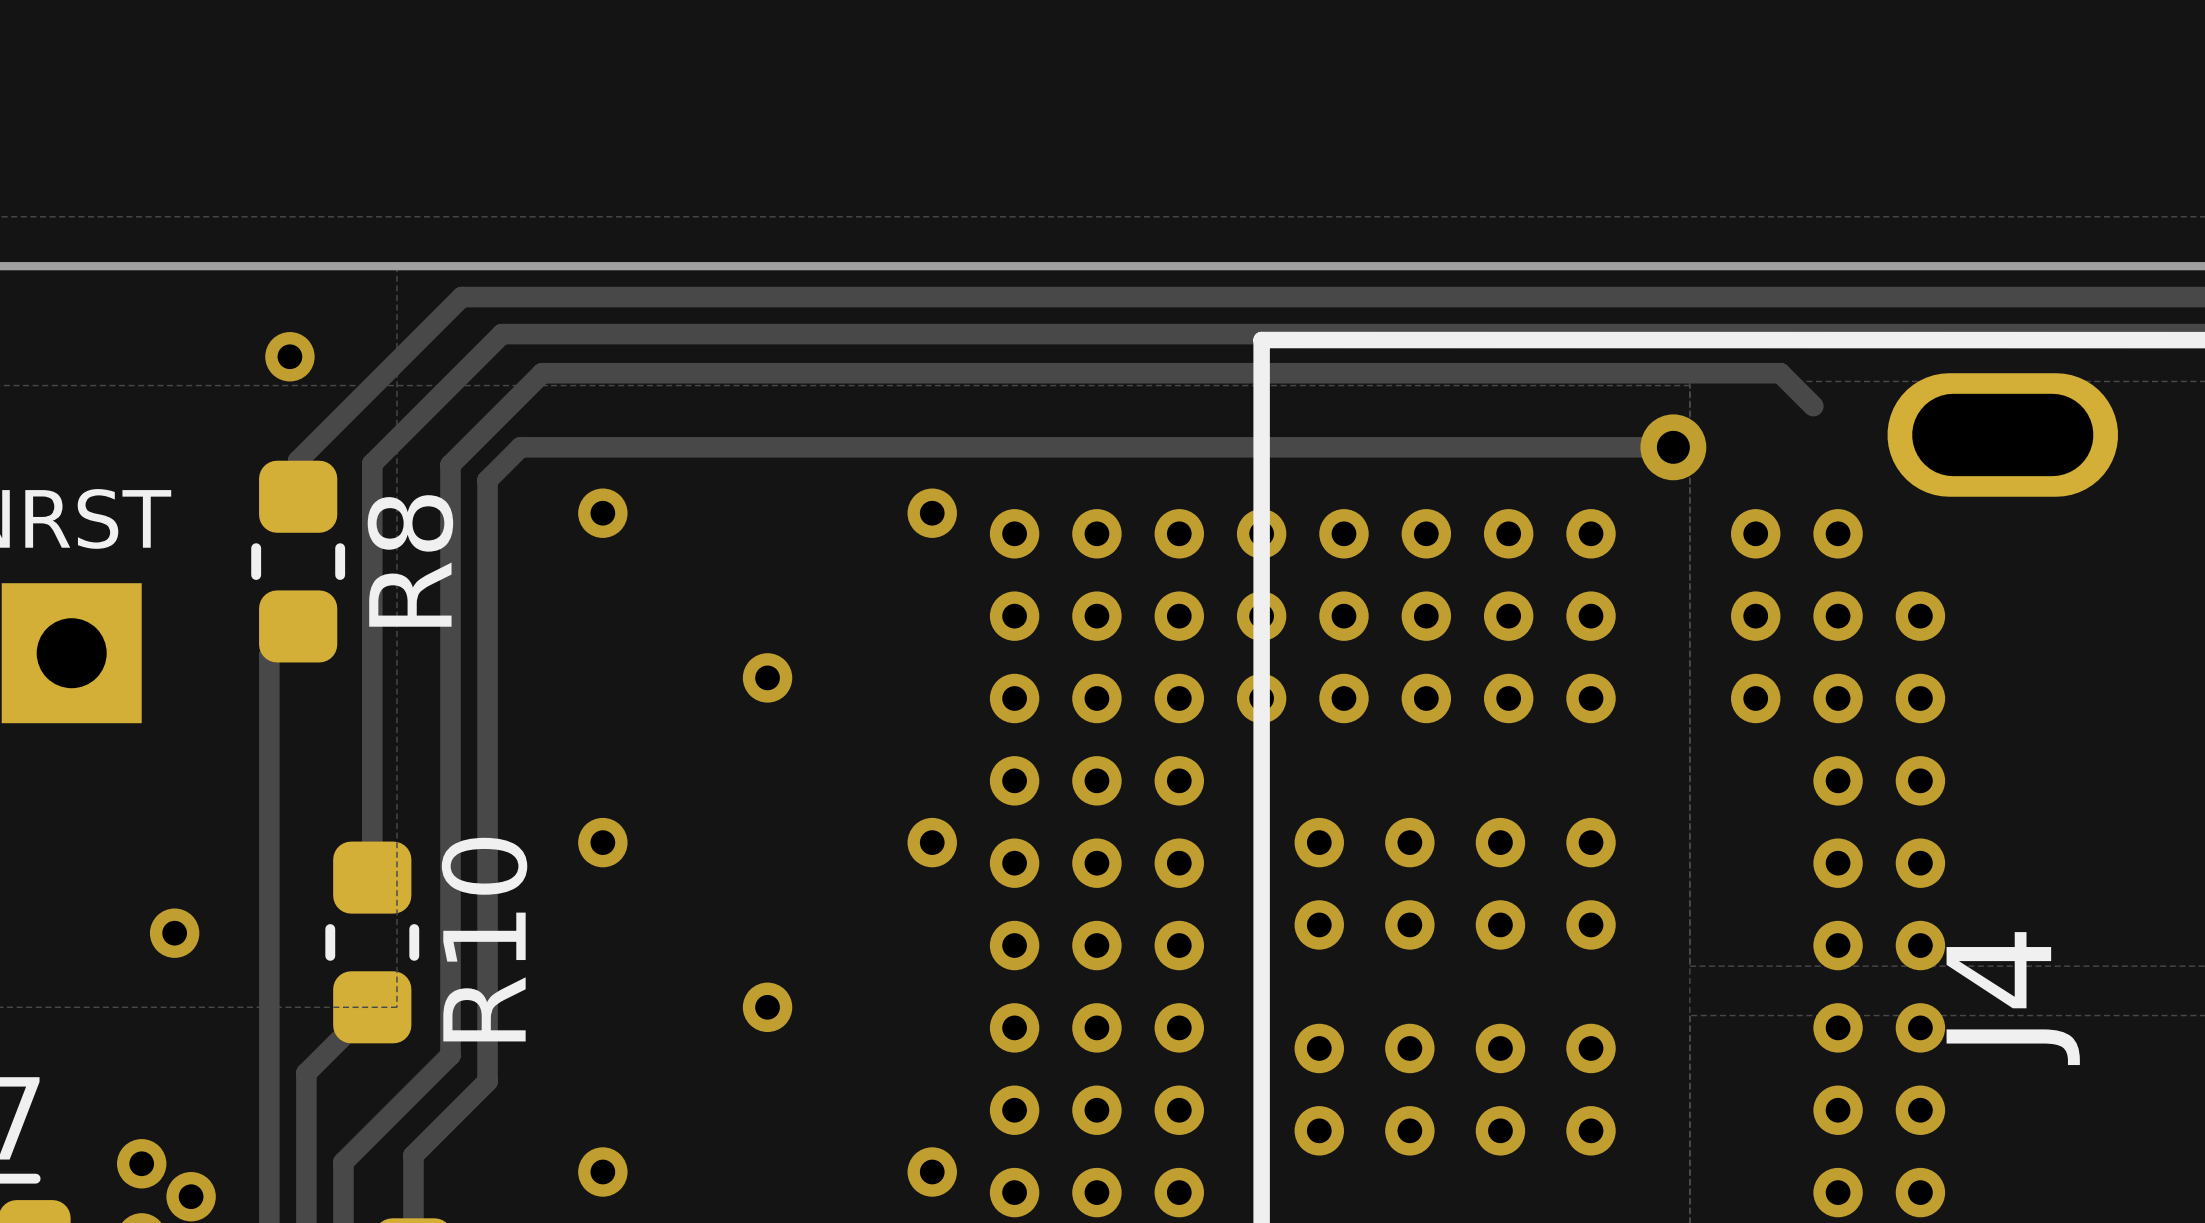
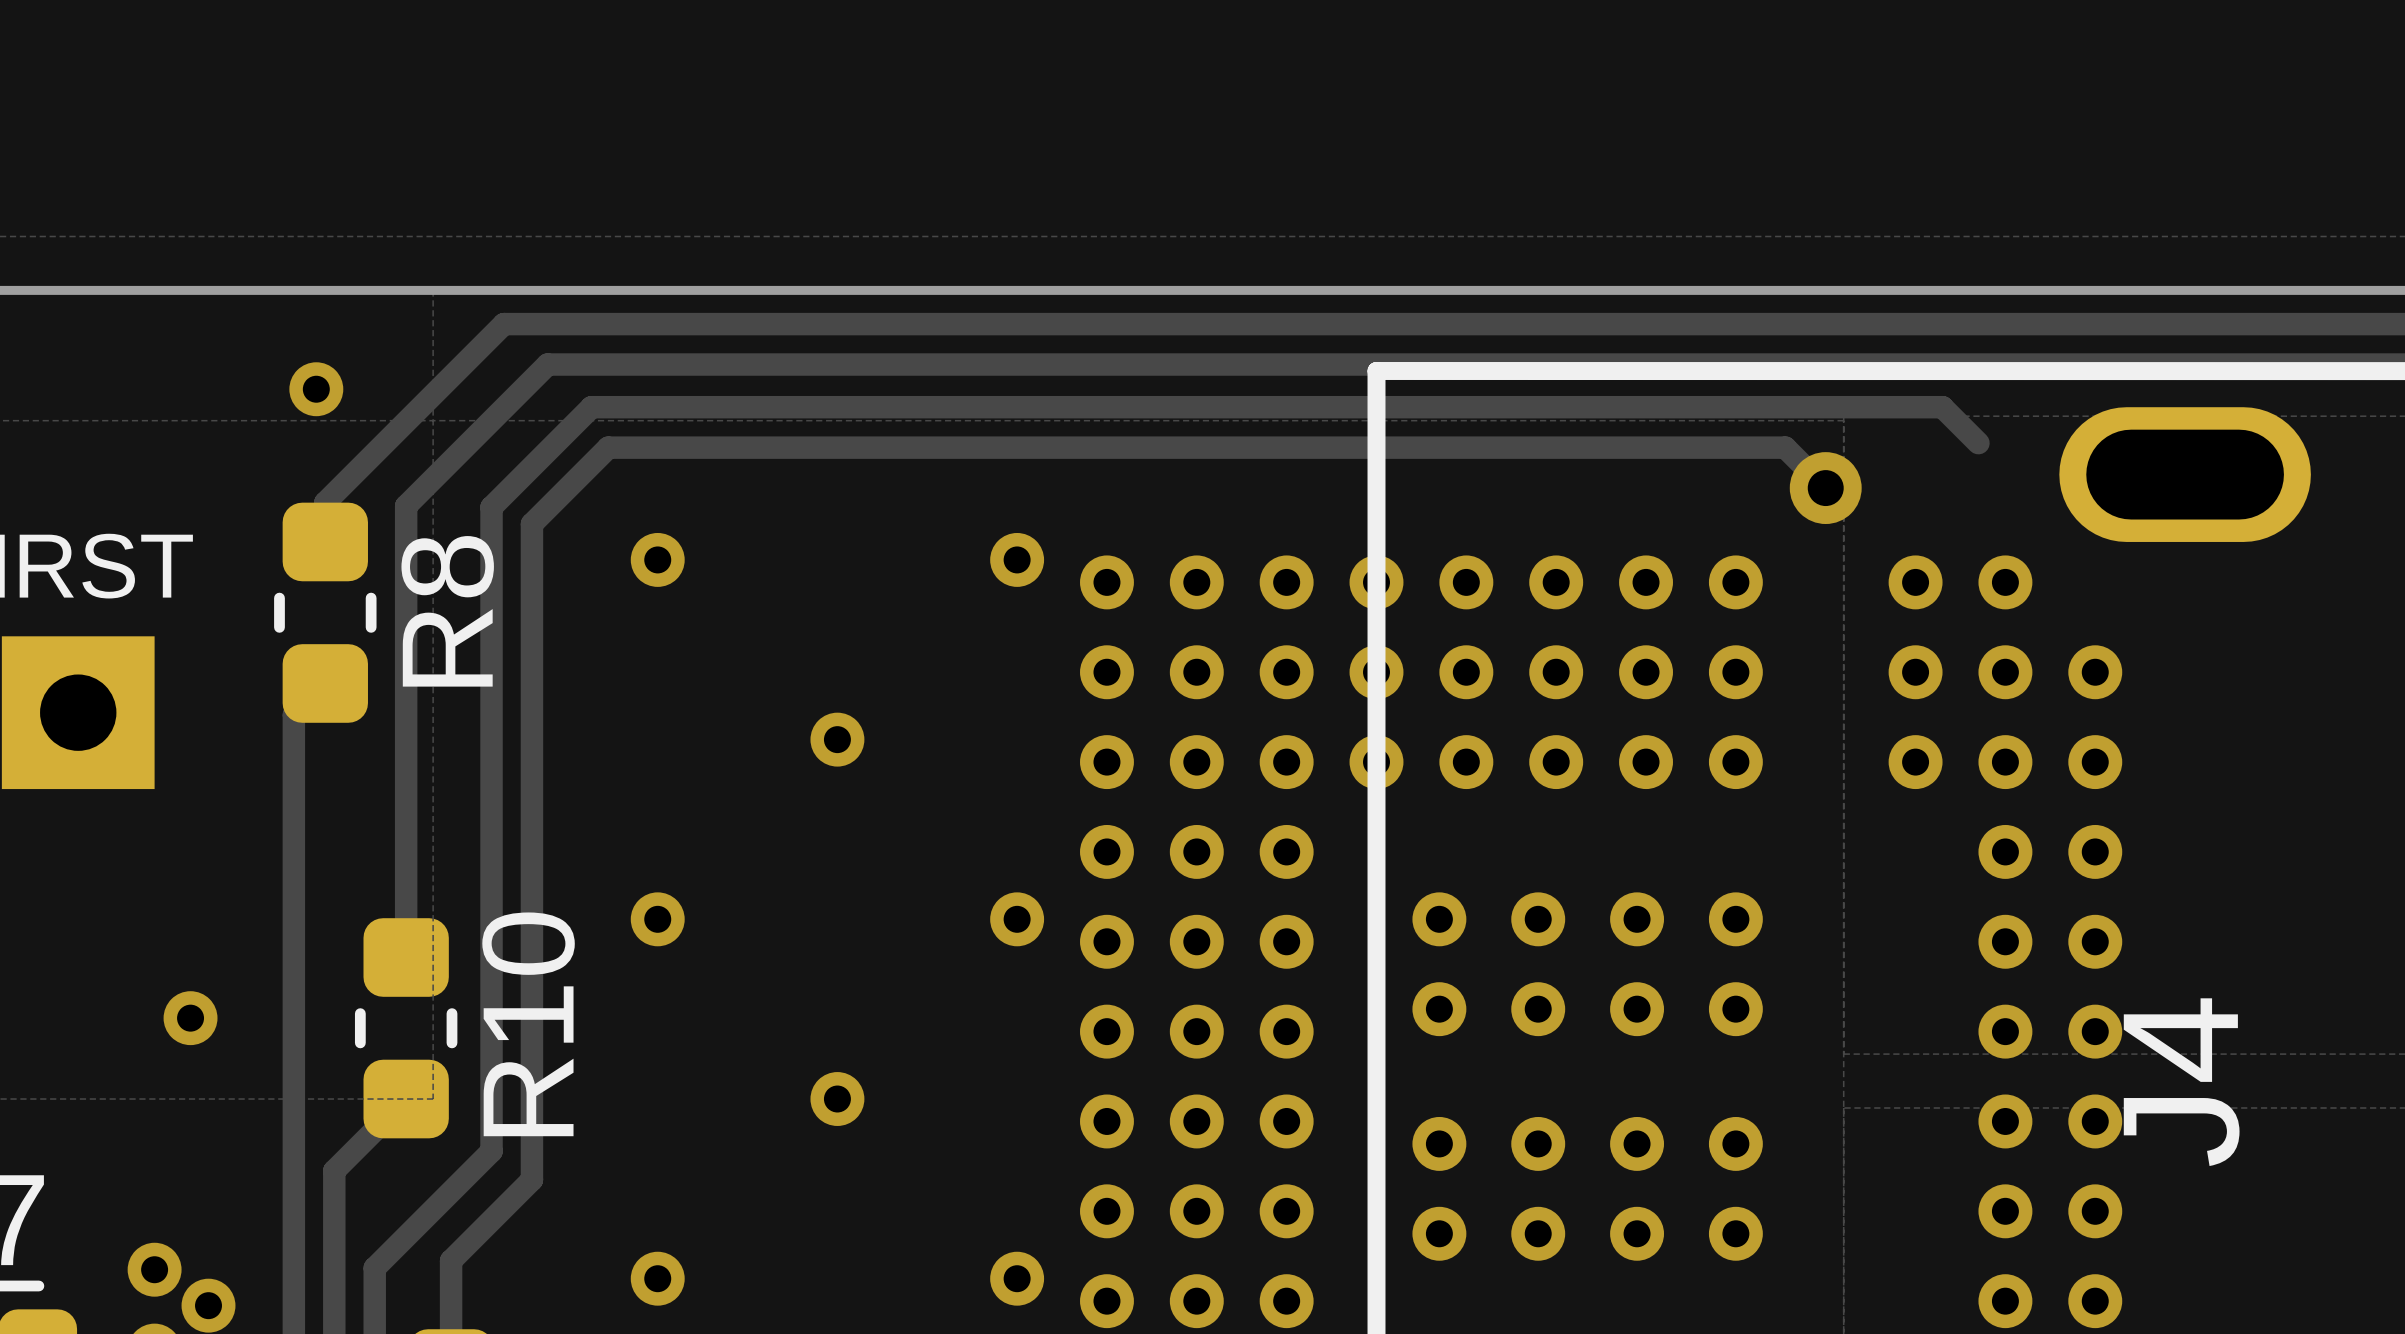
track: (520, 447) (1673, 447) -> (567, 488) (608, 447) (1785, 447) (1825, 488)

